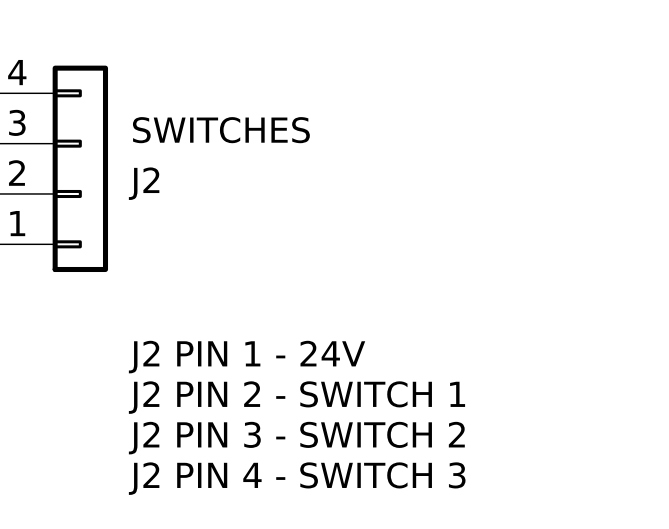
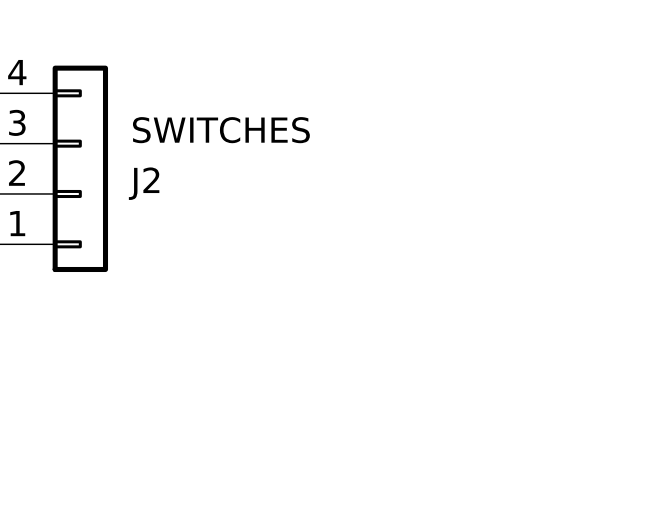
text: J2 PIN 1 - 24V (247, 357) -> none
text: J2 PIN 2 - SWITCH 1 (296, 397) -> none
text: J2 PIN 3 - SWITCH 2 (296, 438) -> none
text: J2 PIN 4 - SWITCH 3 (297, 478) -> none

